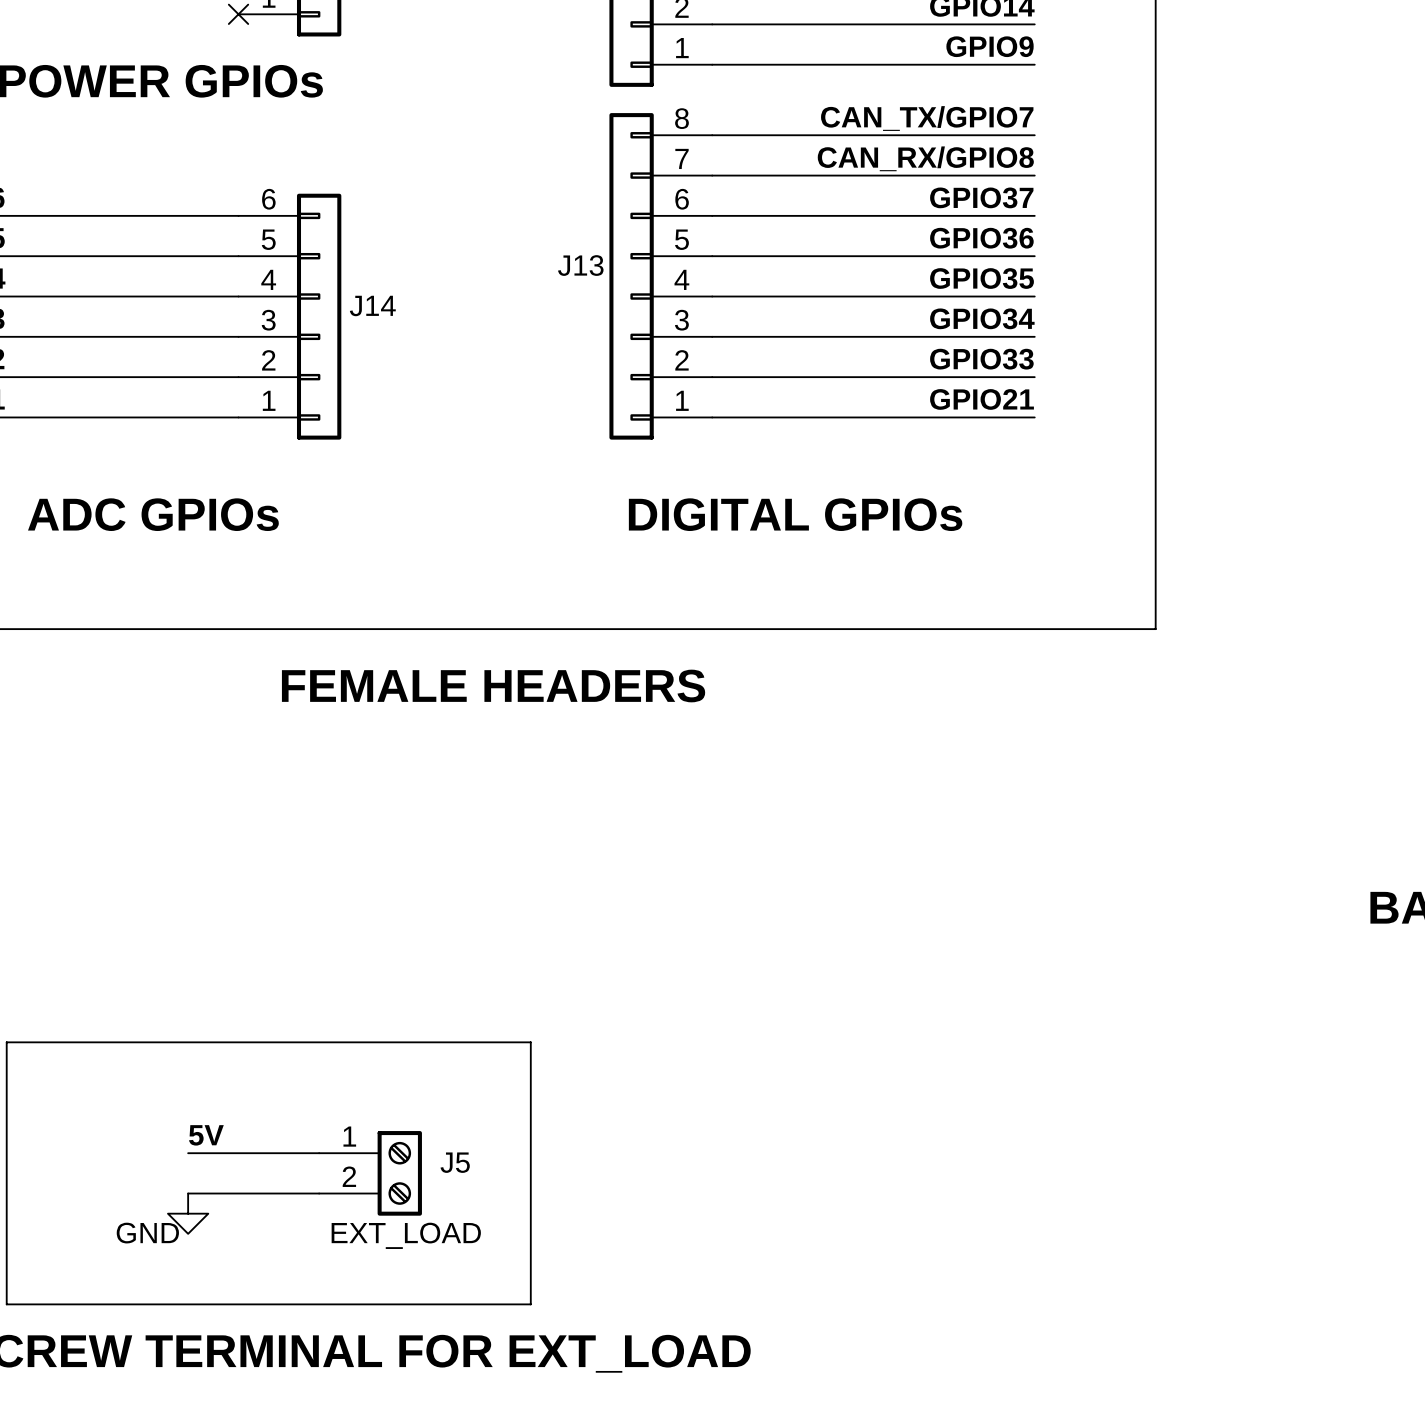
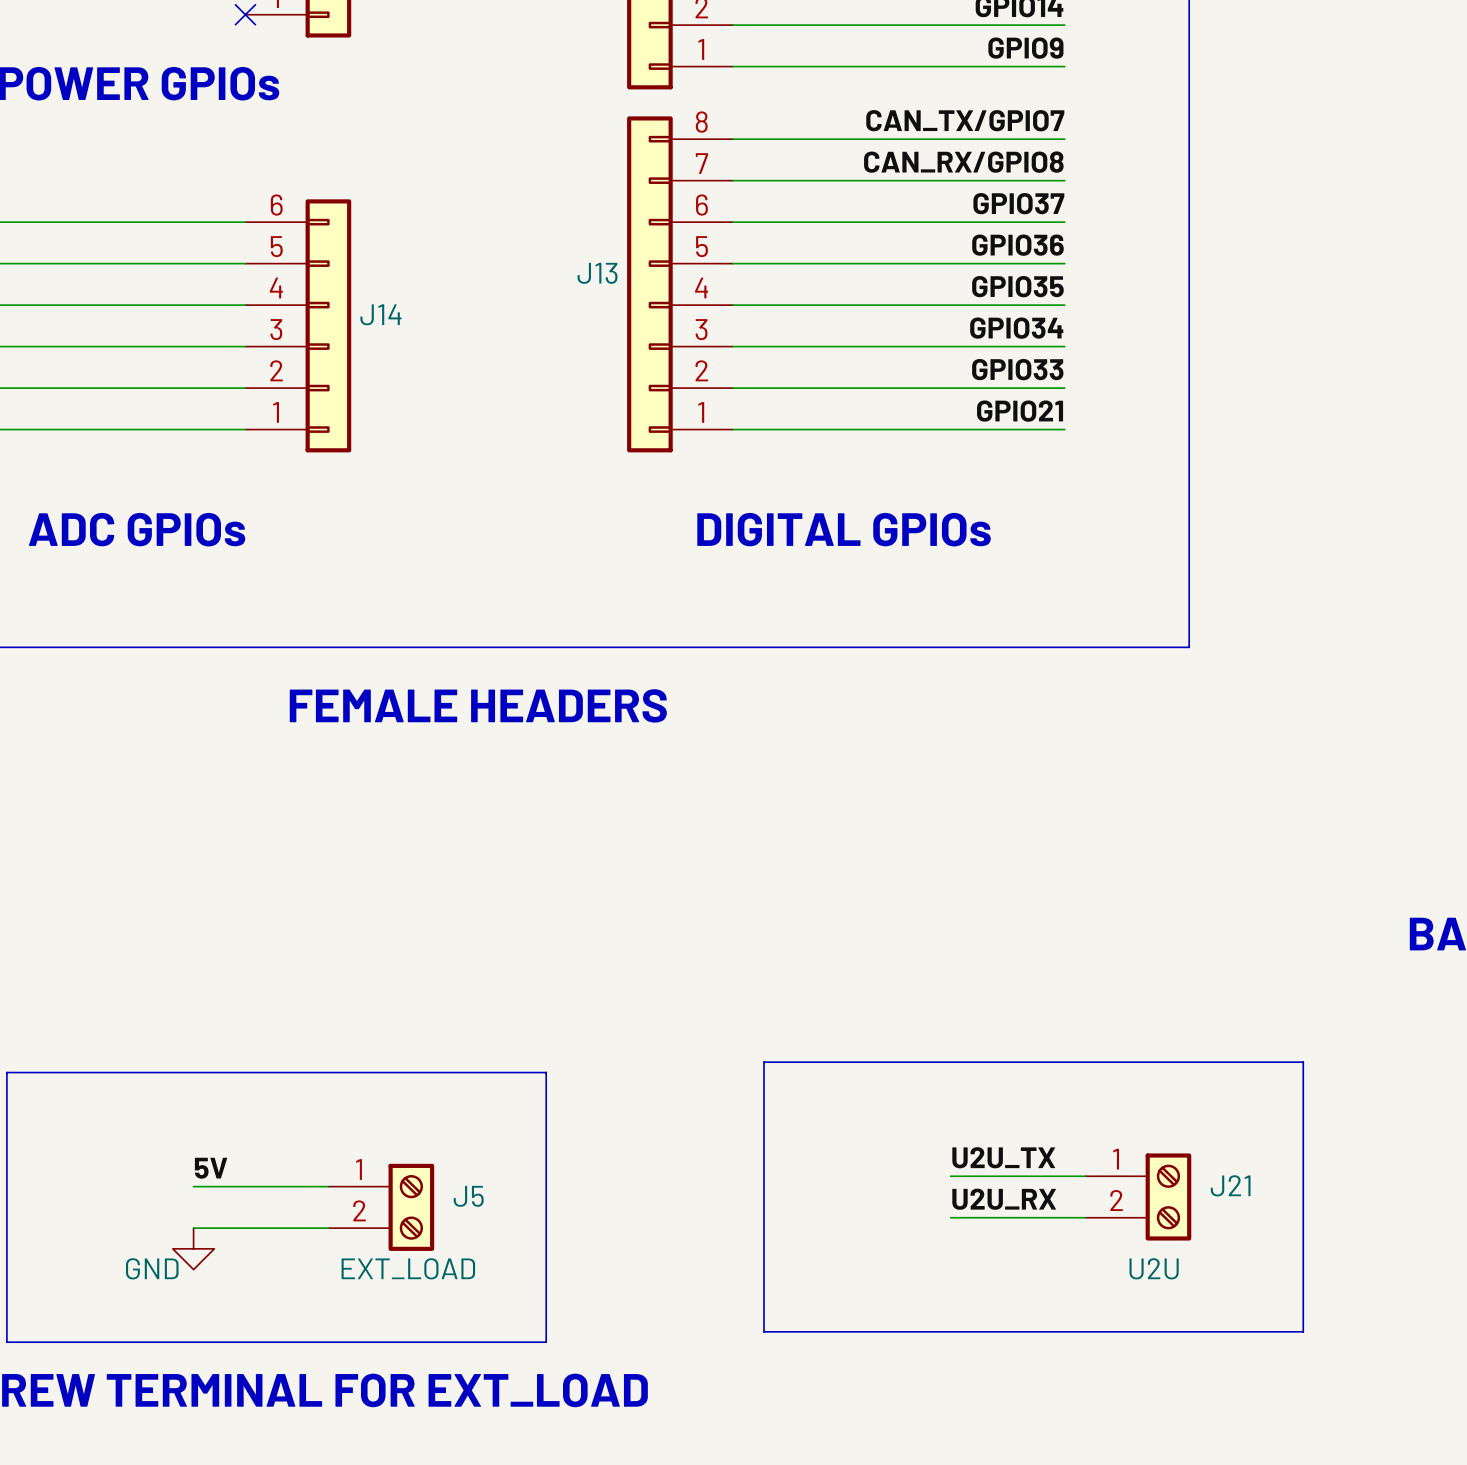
bus: none -> (763, 1062) (1303, 1062) (1303, 1331) (763, 1331) (763, 1062)
label: none -> U2U_TX (1003, 1157)
wire: none -> (950, 1176) (1085, 1176)
J21: none -> U2U (1138, 1197)
label: none -> U2U_RX (1004, 1199)
wire: none -> (950, 1217) (1085, 1217)

